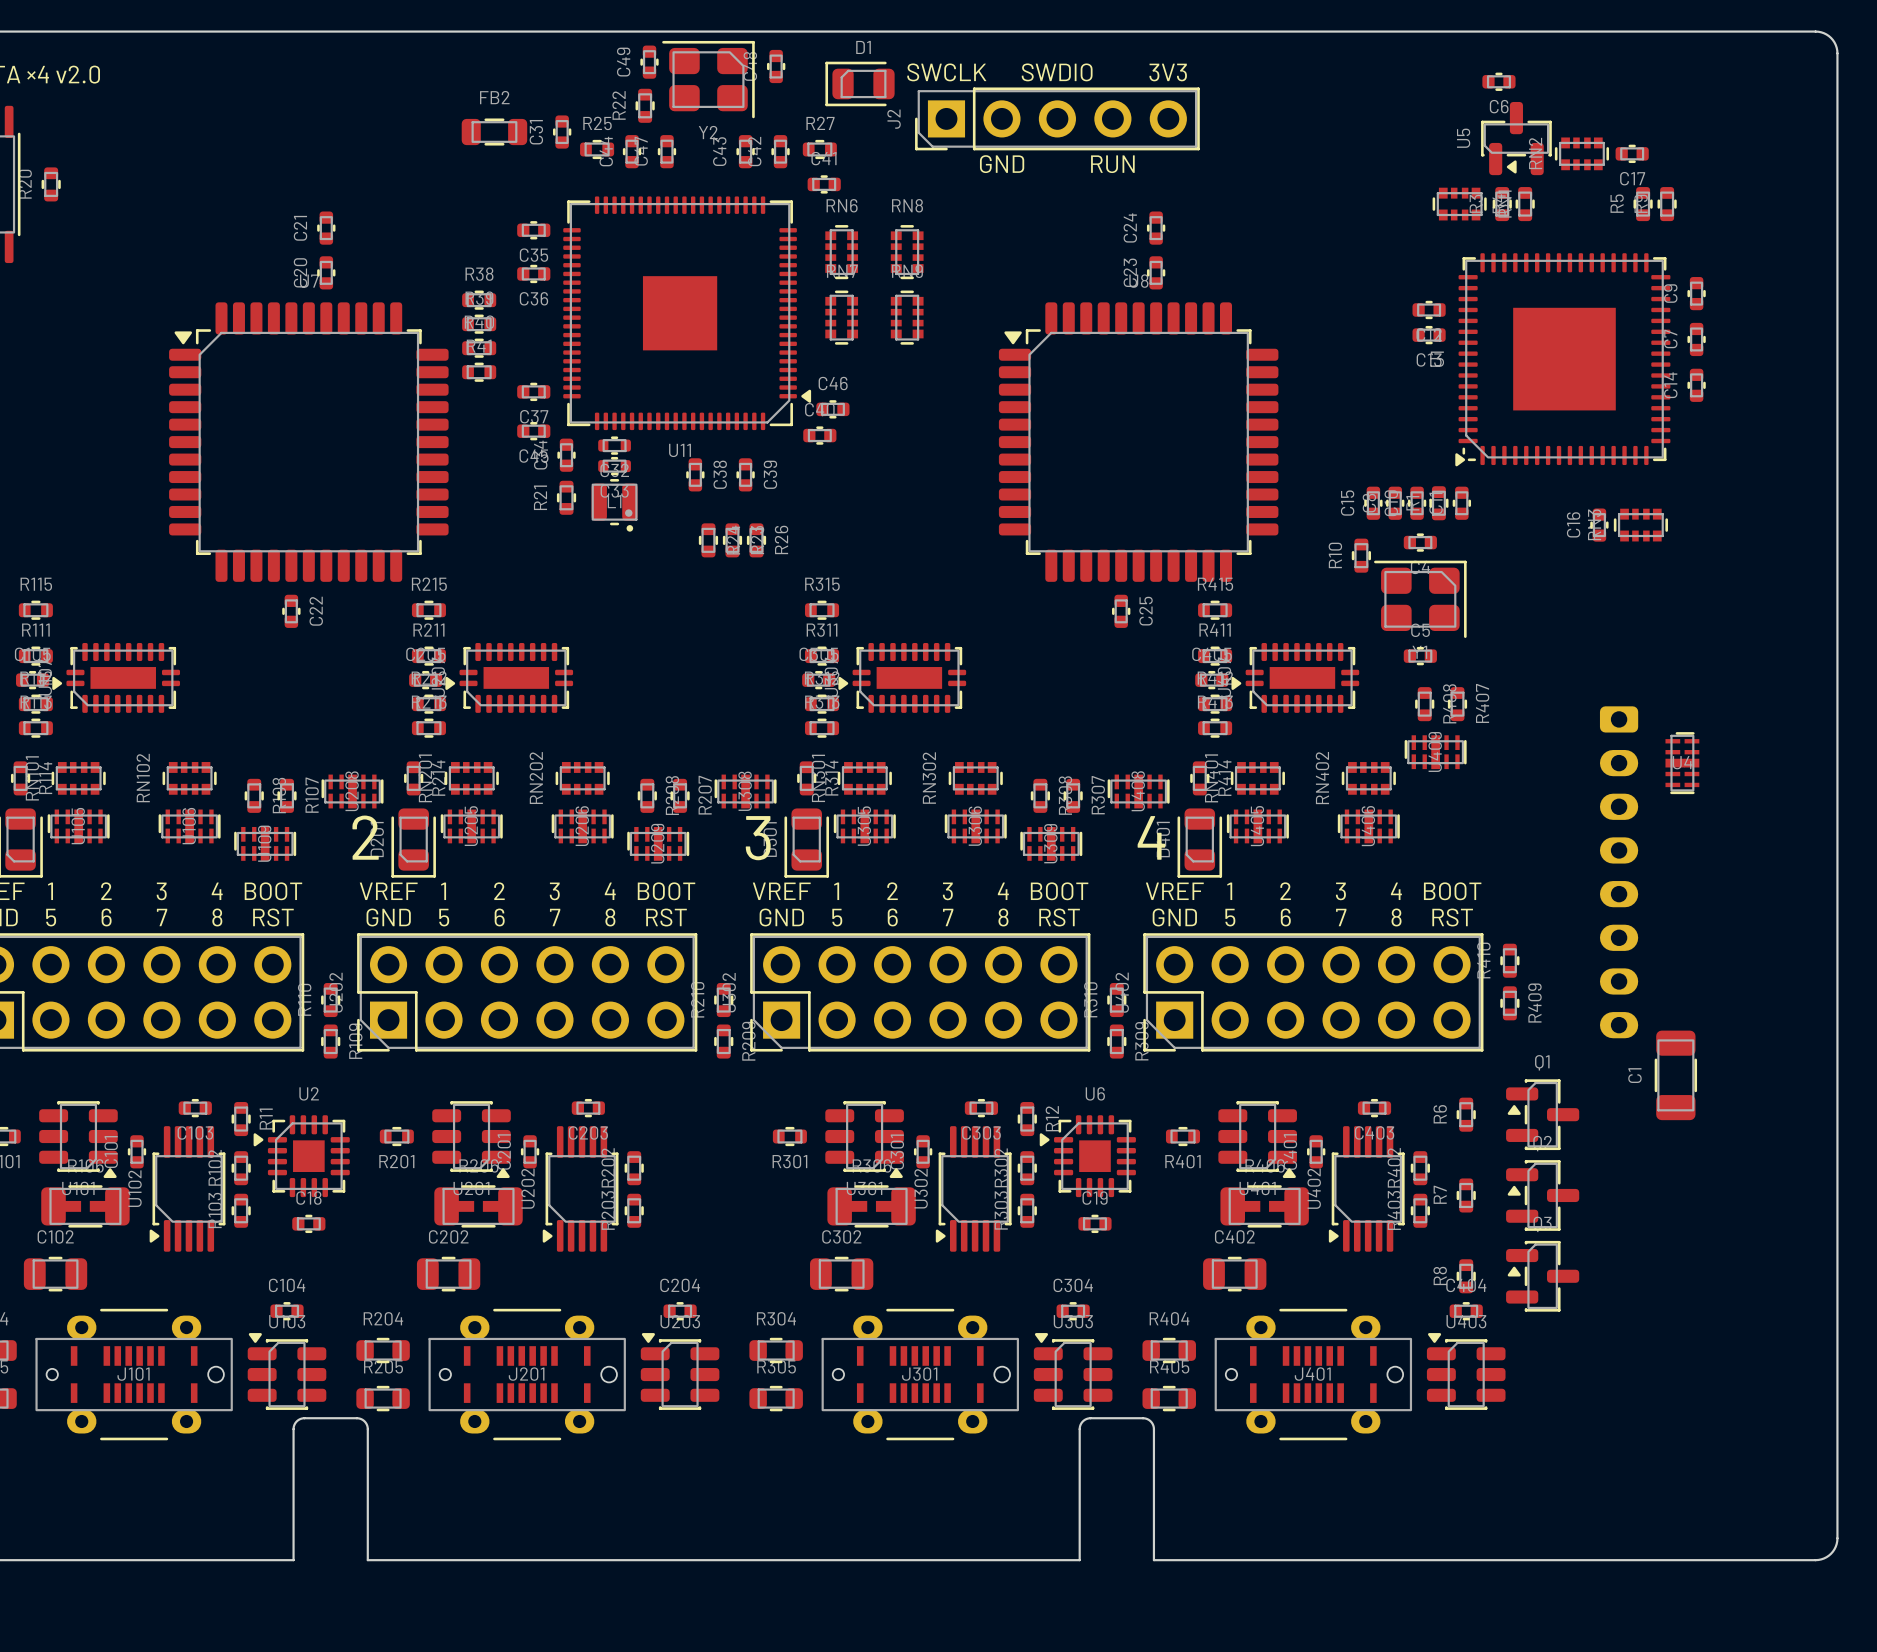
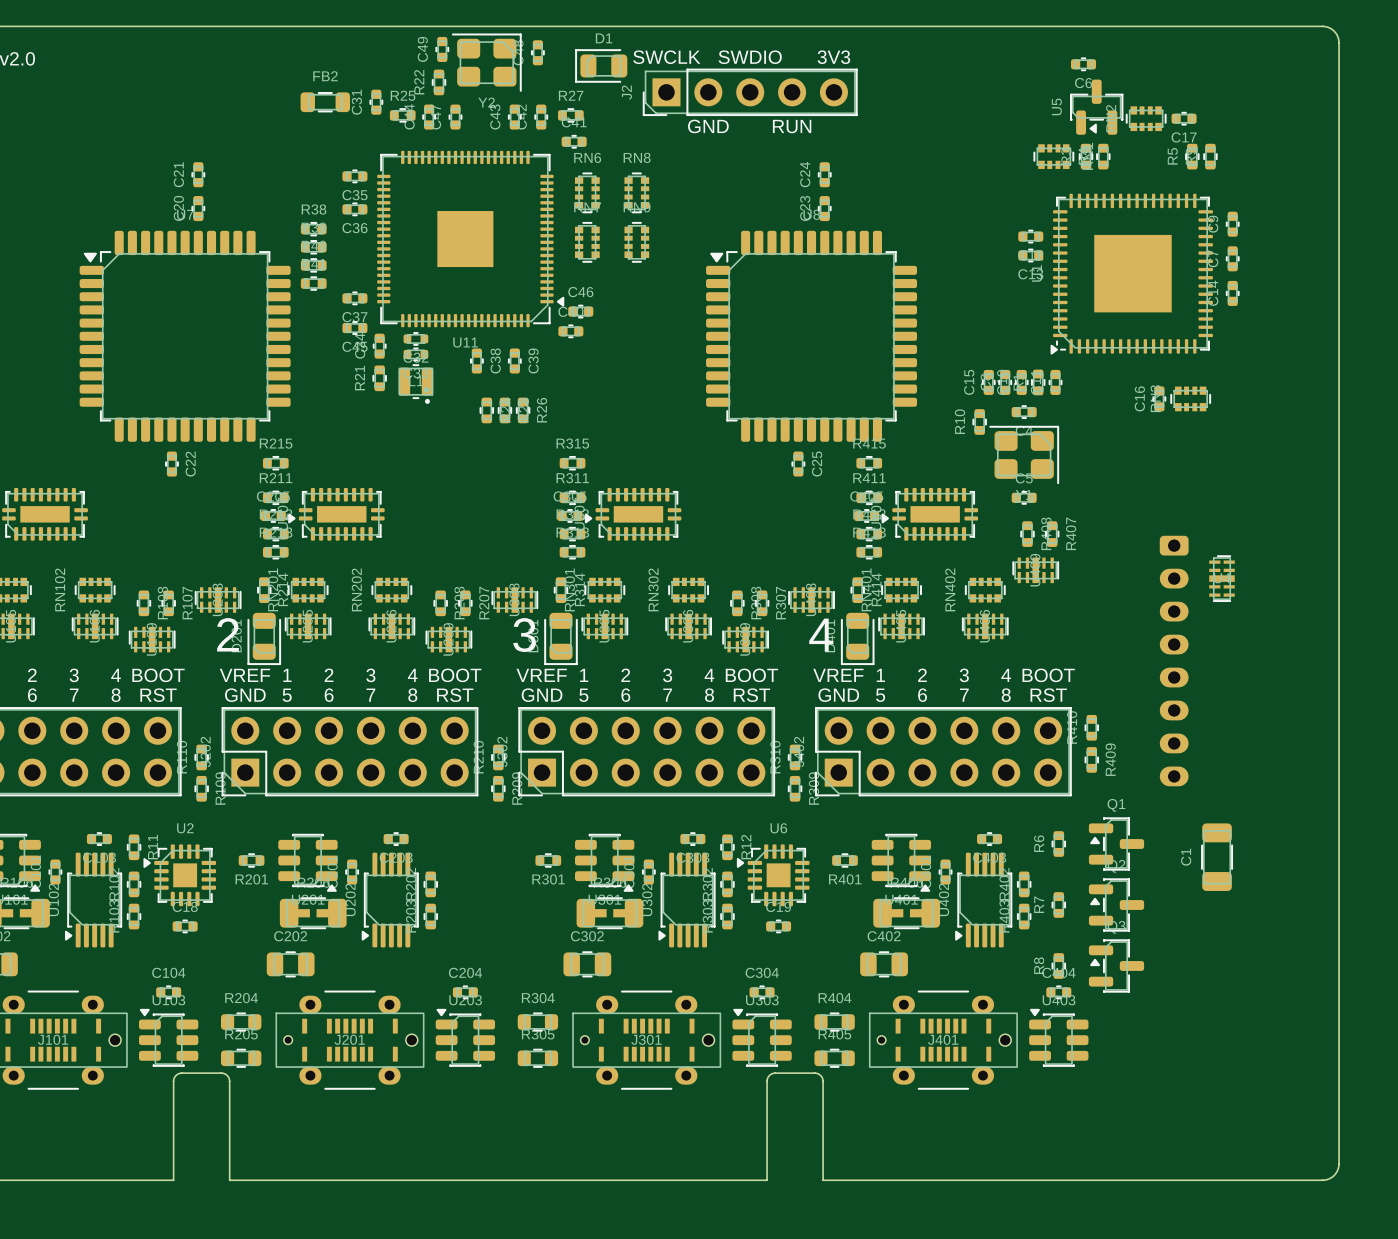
C1 position: (1675, 1075) -> (1217, 857)

